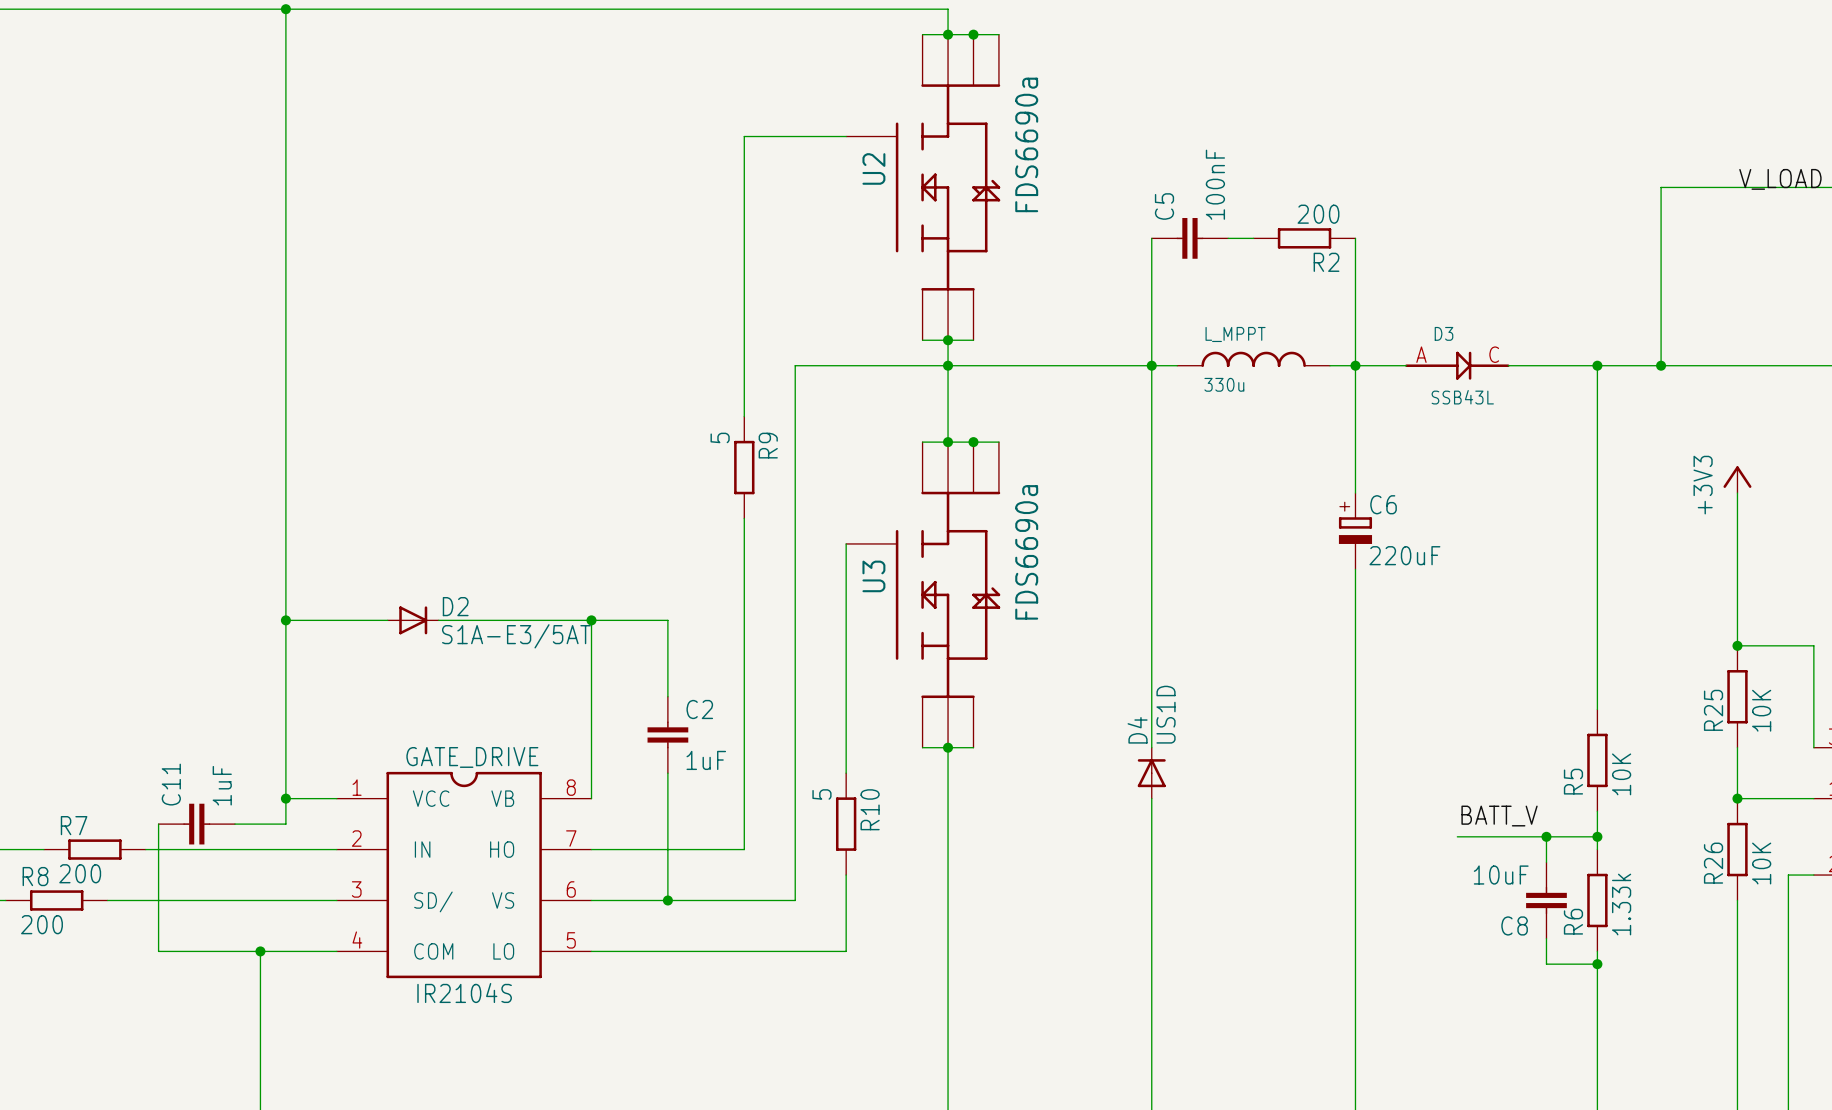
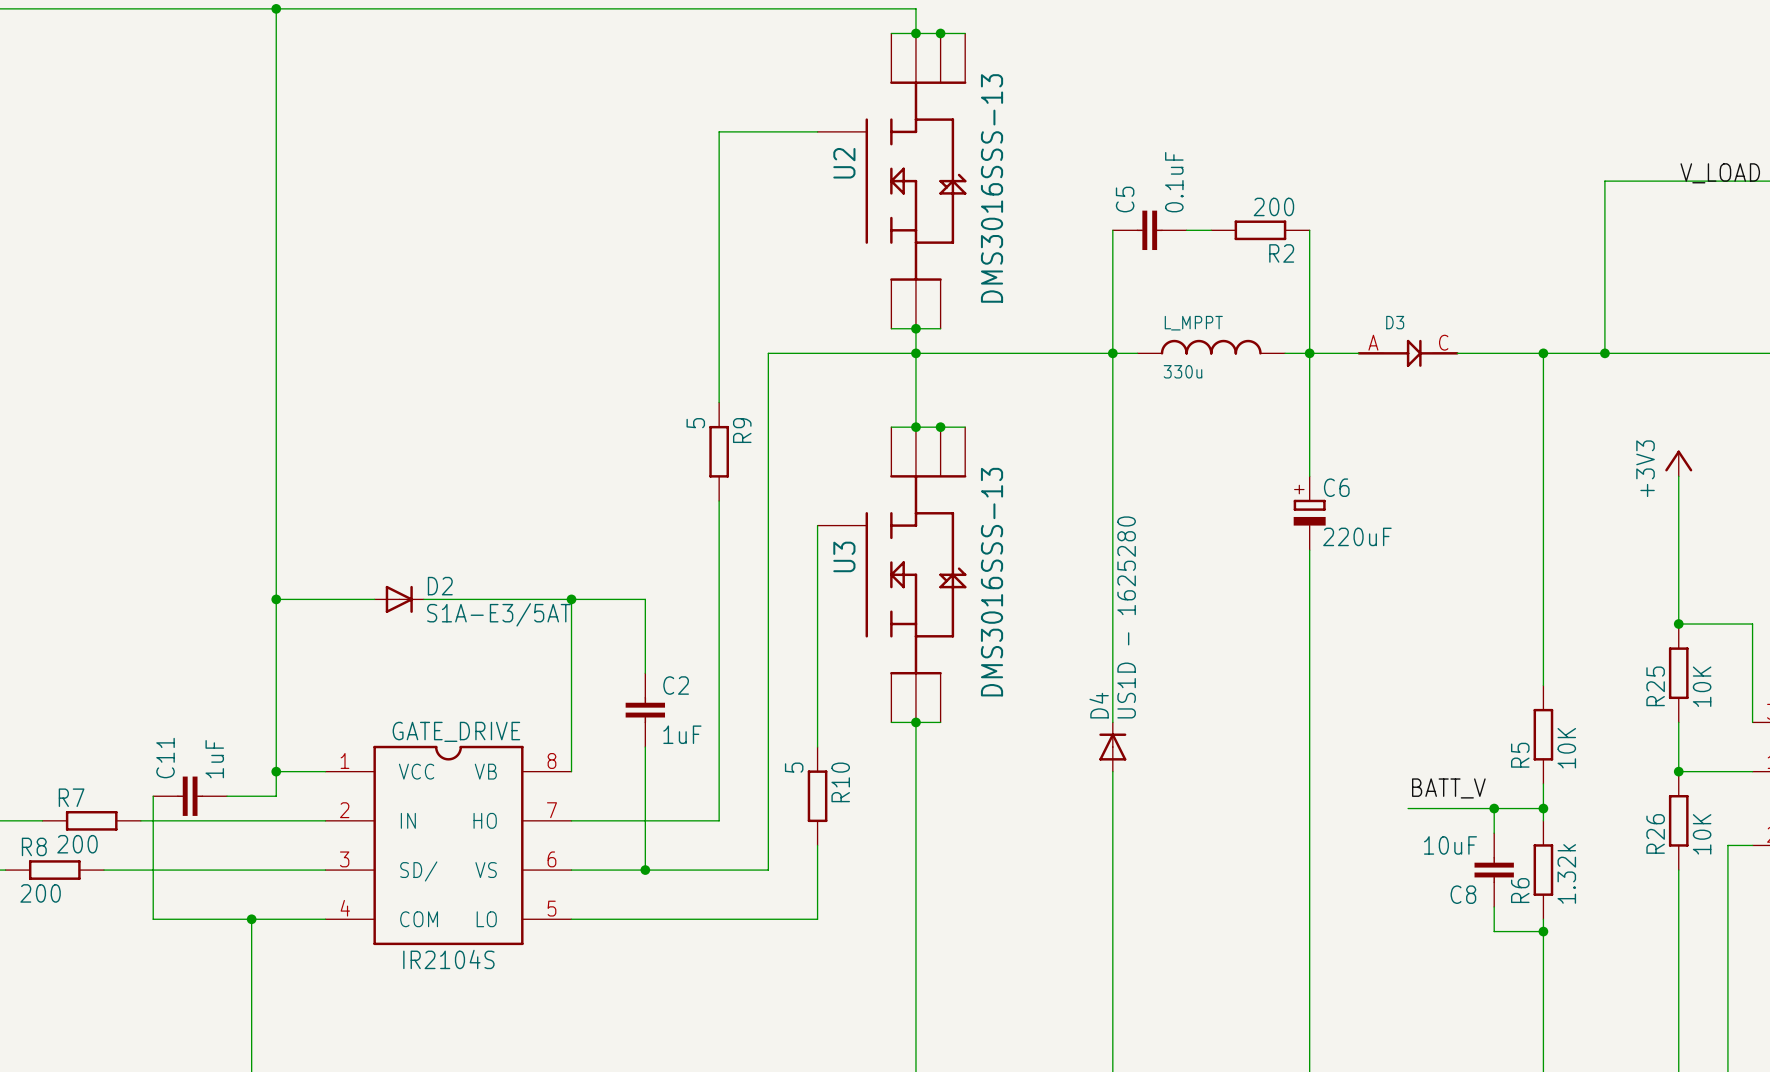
U2 value: FDS6690a (1026, 144) -> DMS3016SSS-13 (992, 188)
C5 value: 100nF (1215, 184) -> 0.1uF (1174, 182)
D3 value: SSB43L (1462, 397) -> none
U3 value: FDS6690a (1026, 552) -> DMS3016SSS-13 (992, 582)
D4 value: US1D (1166, 714) -> US1D - 1625280 (1126, 617)
R6 value: 1.33k (1621, 904) -> 1.32k (1566, 873)

